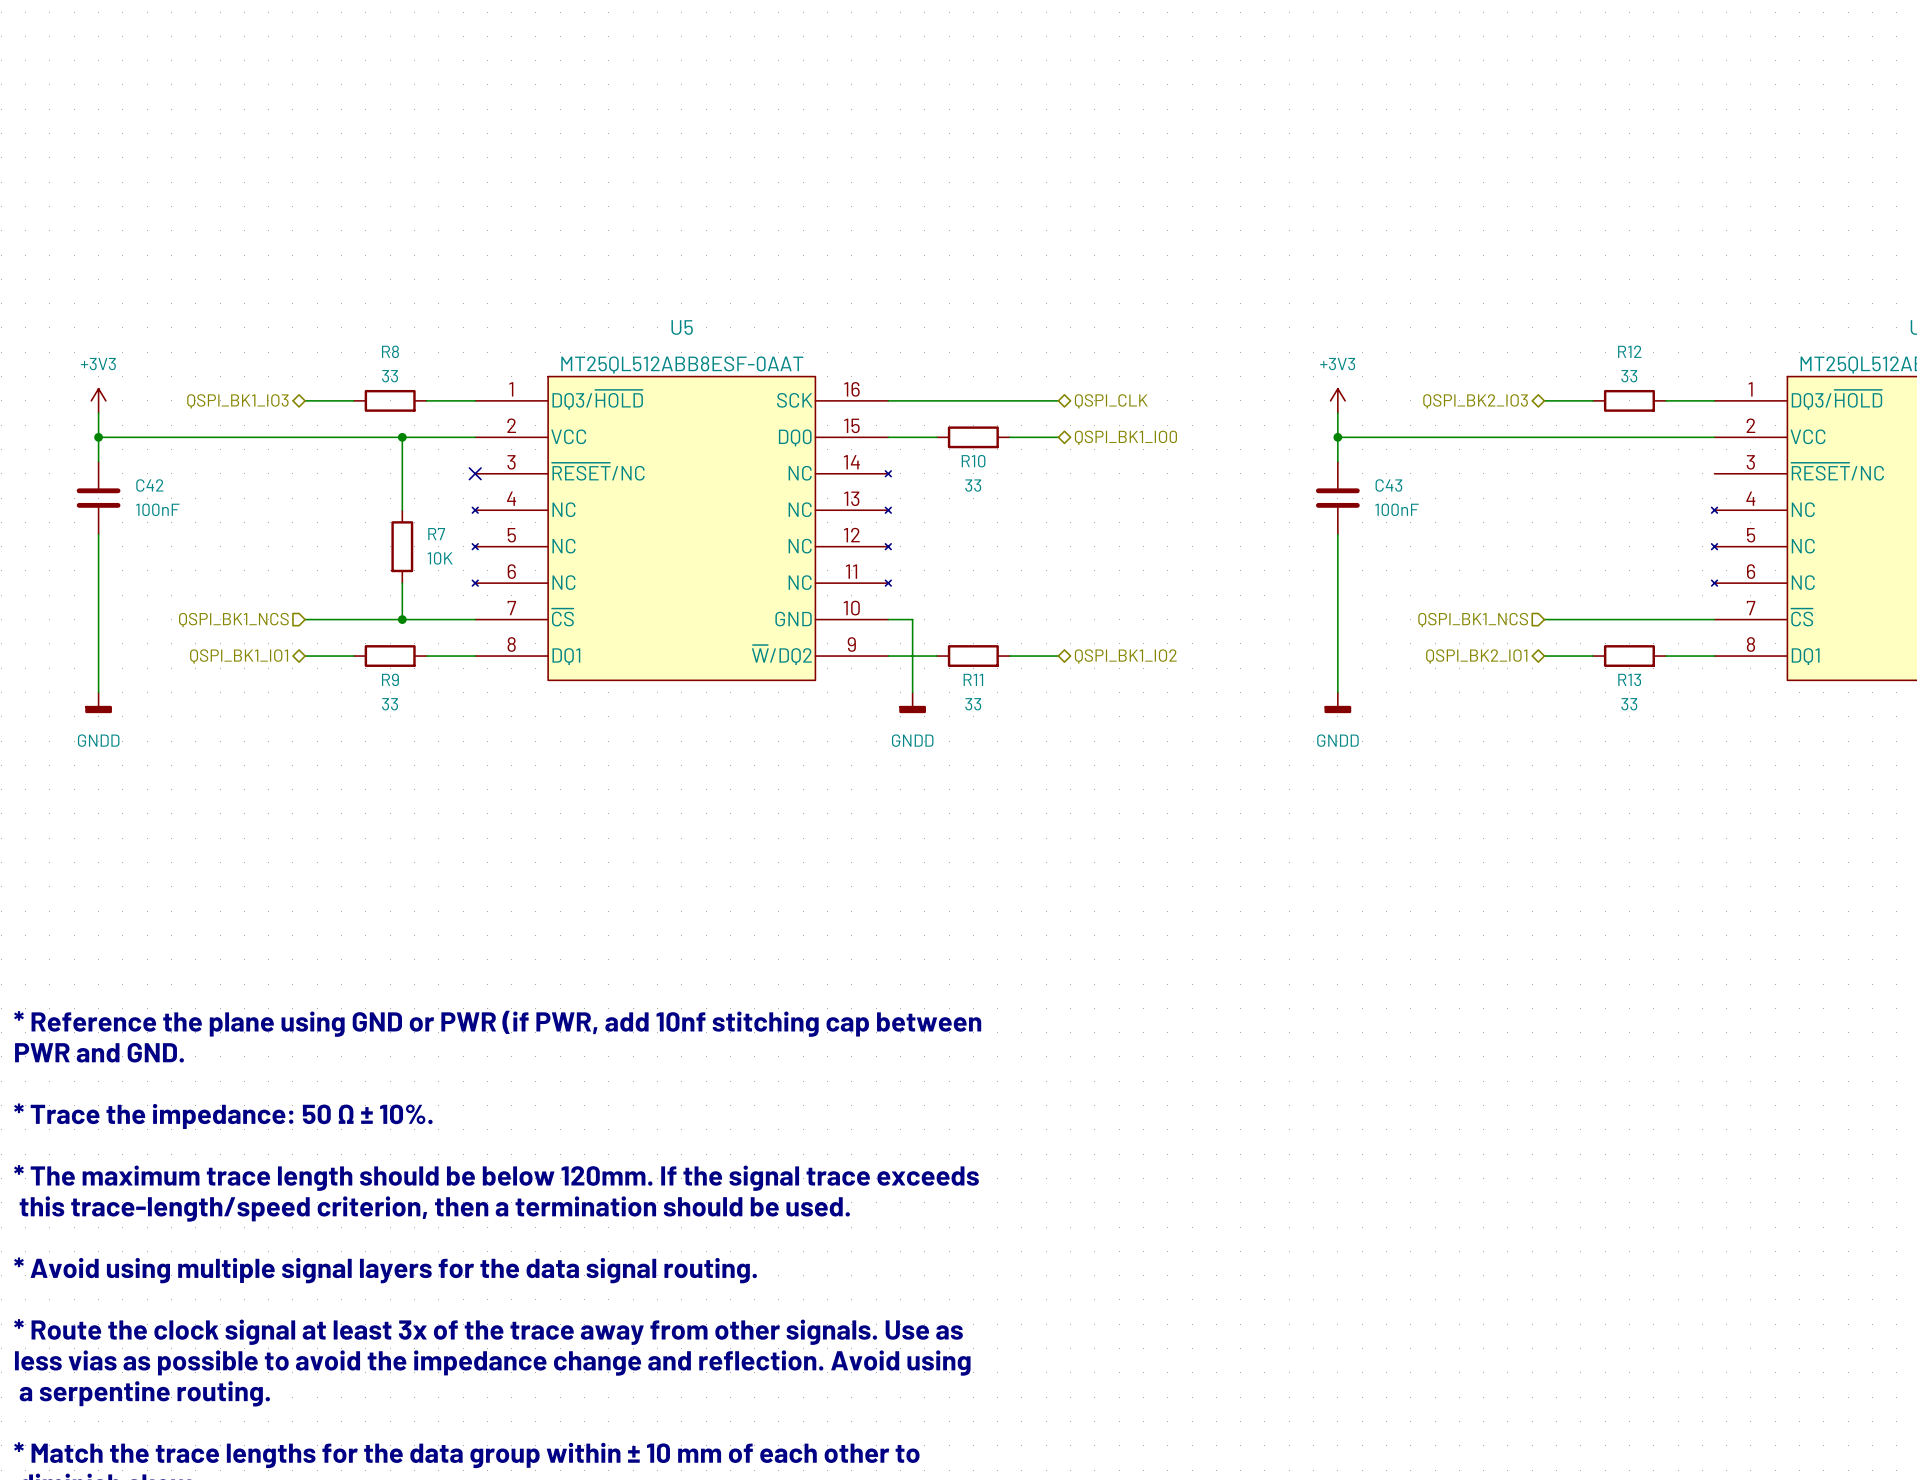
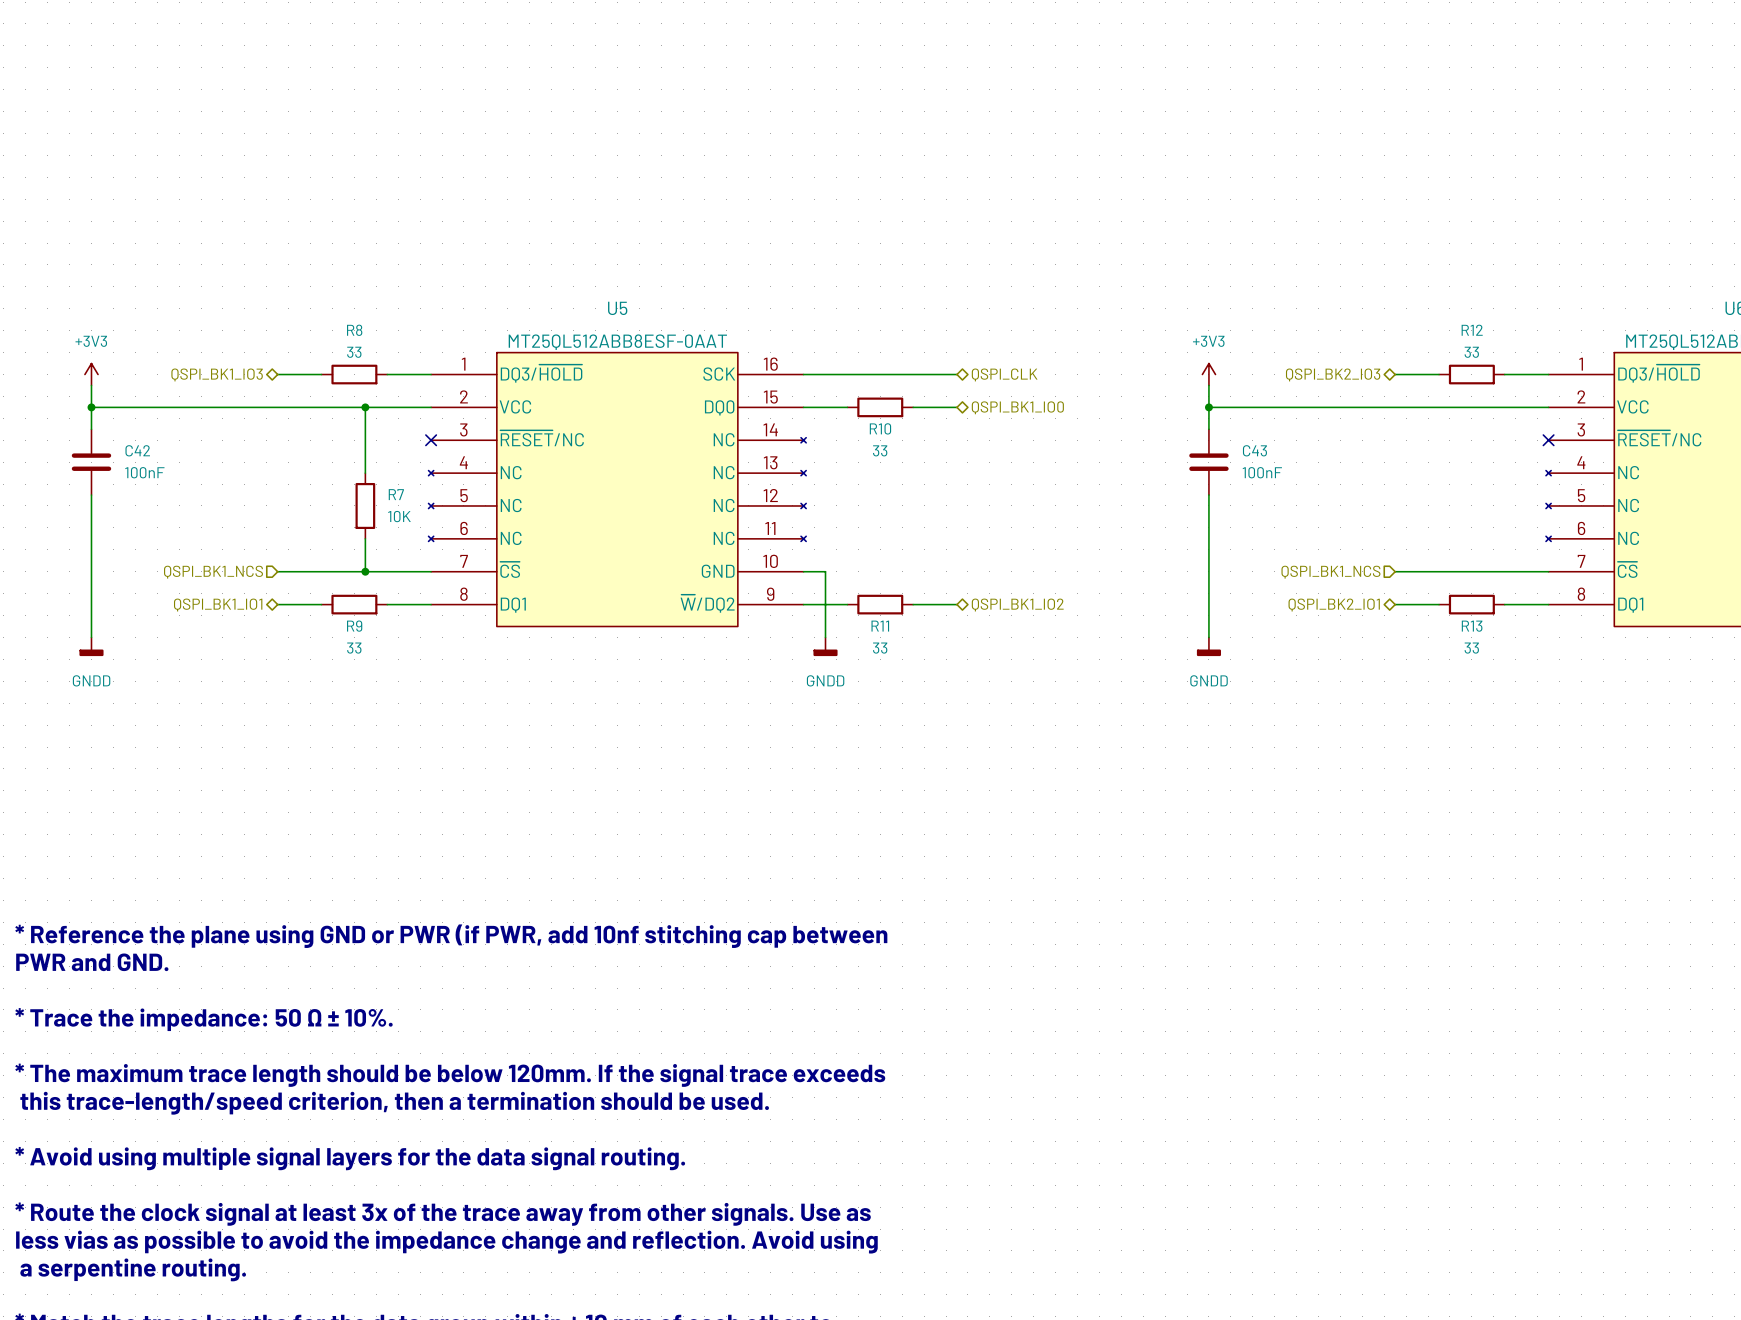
no-connect mark: none -> (1548, 440)

